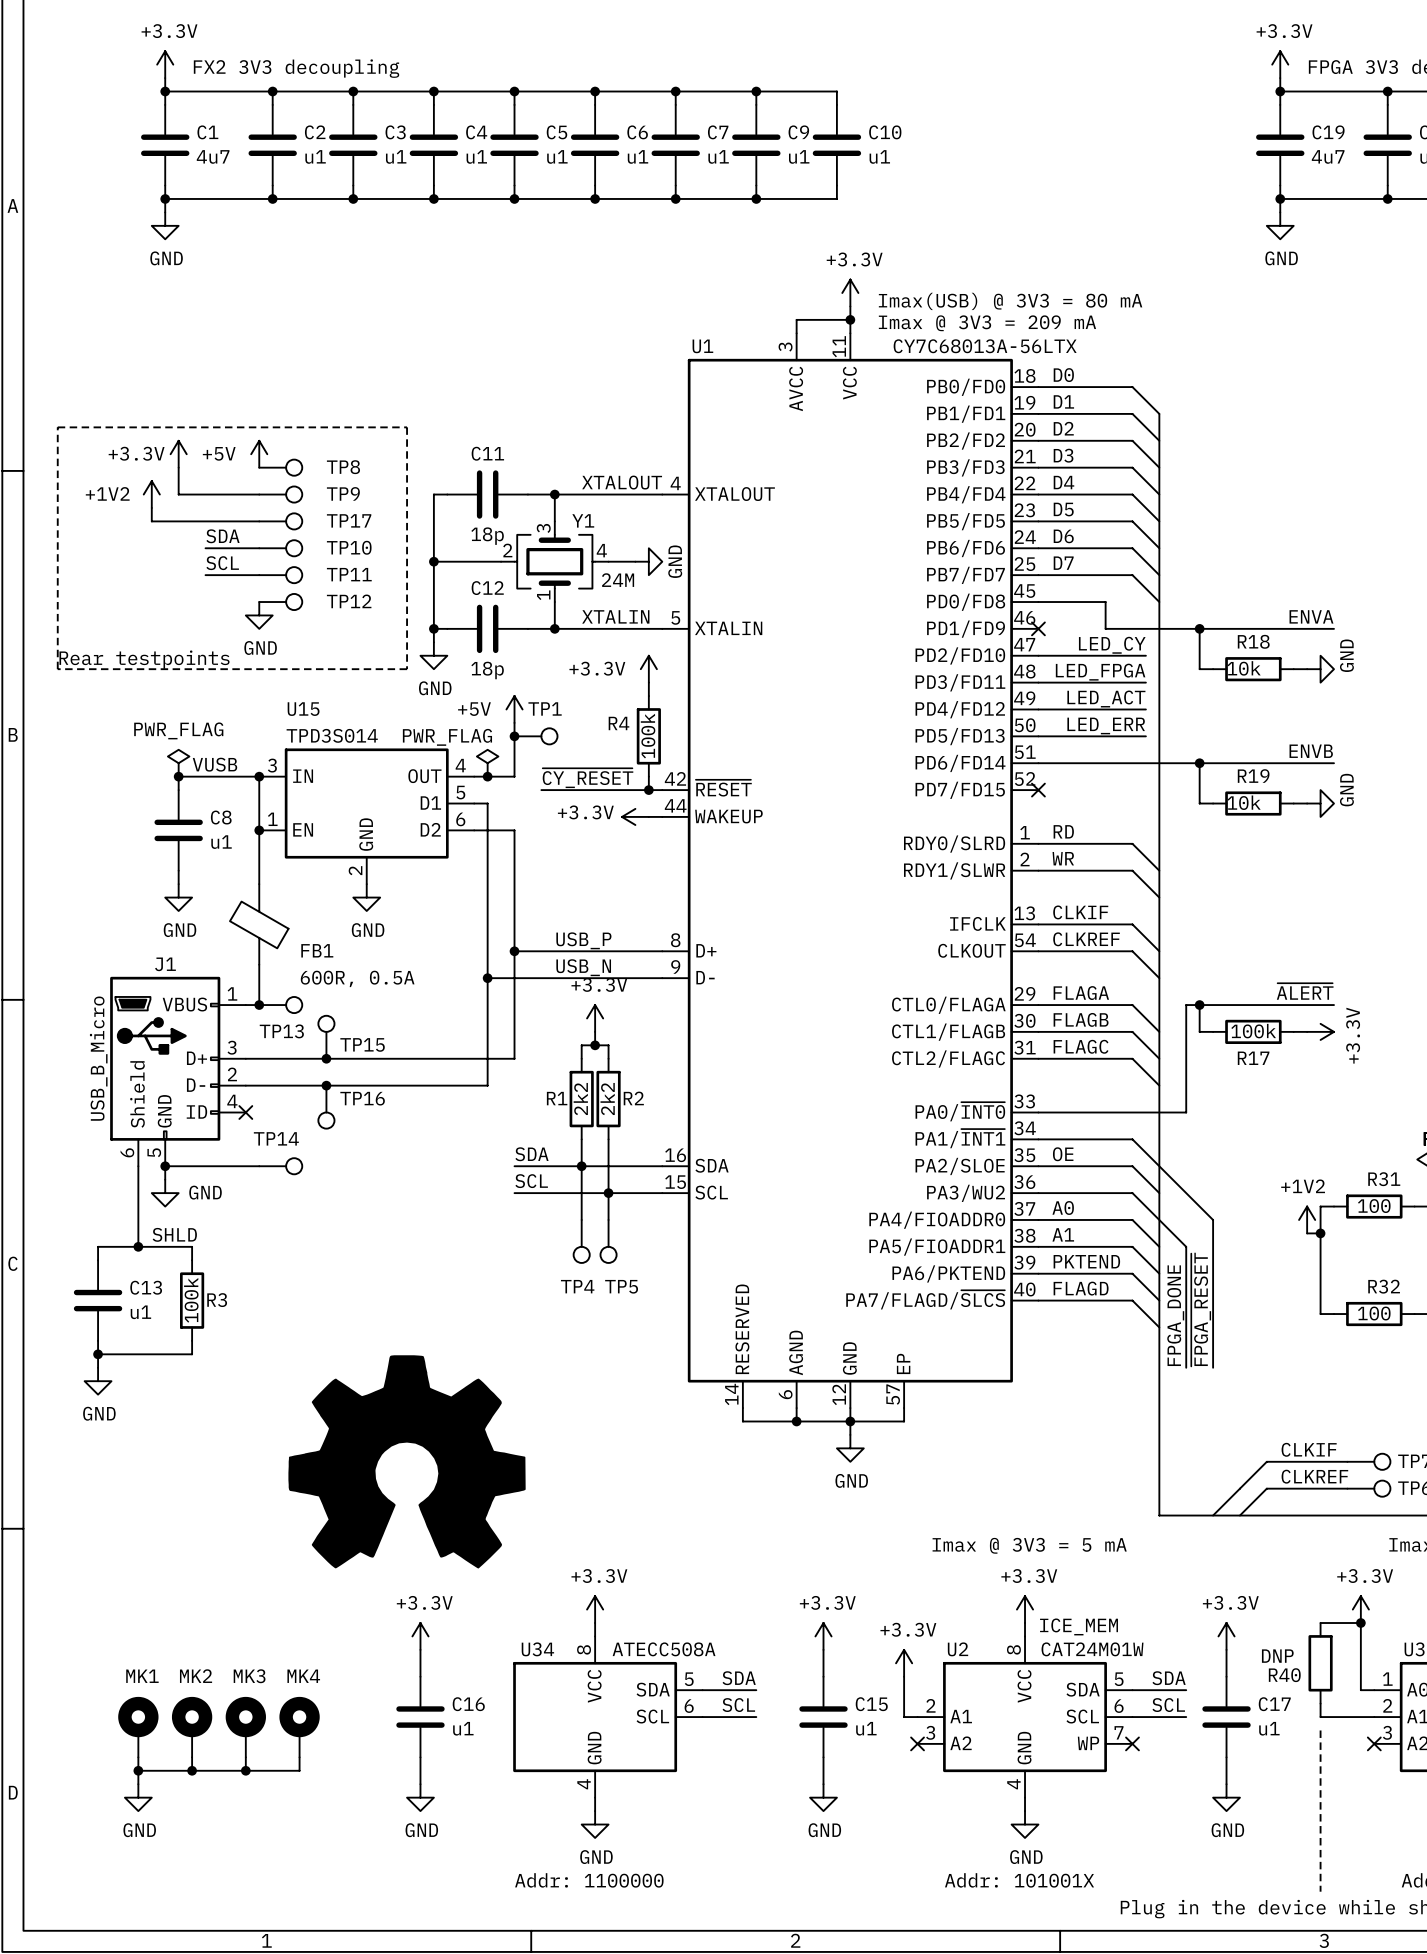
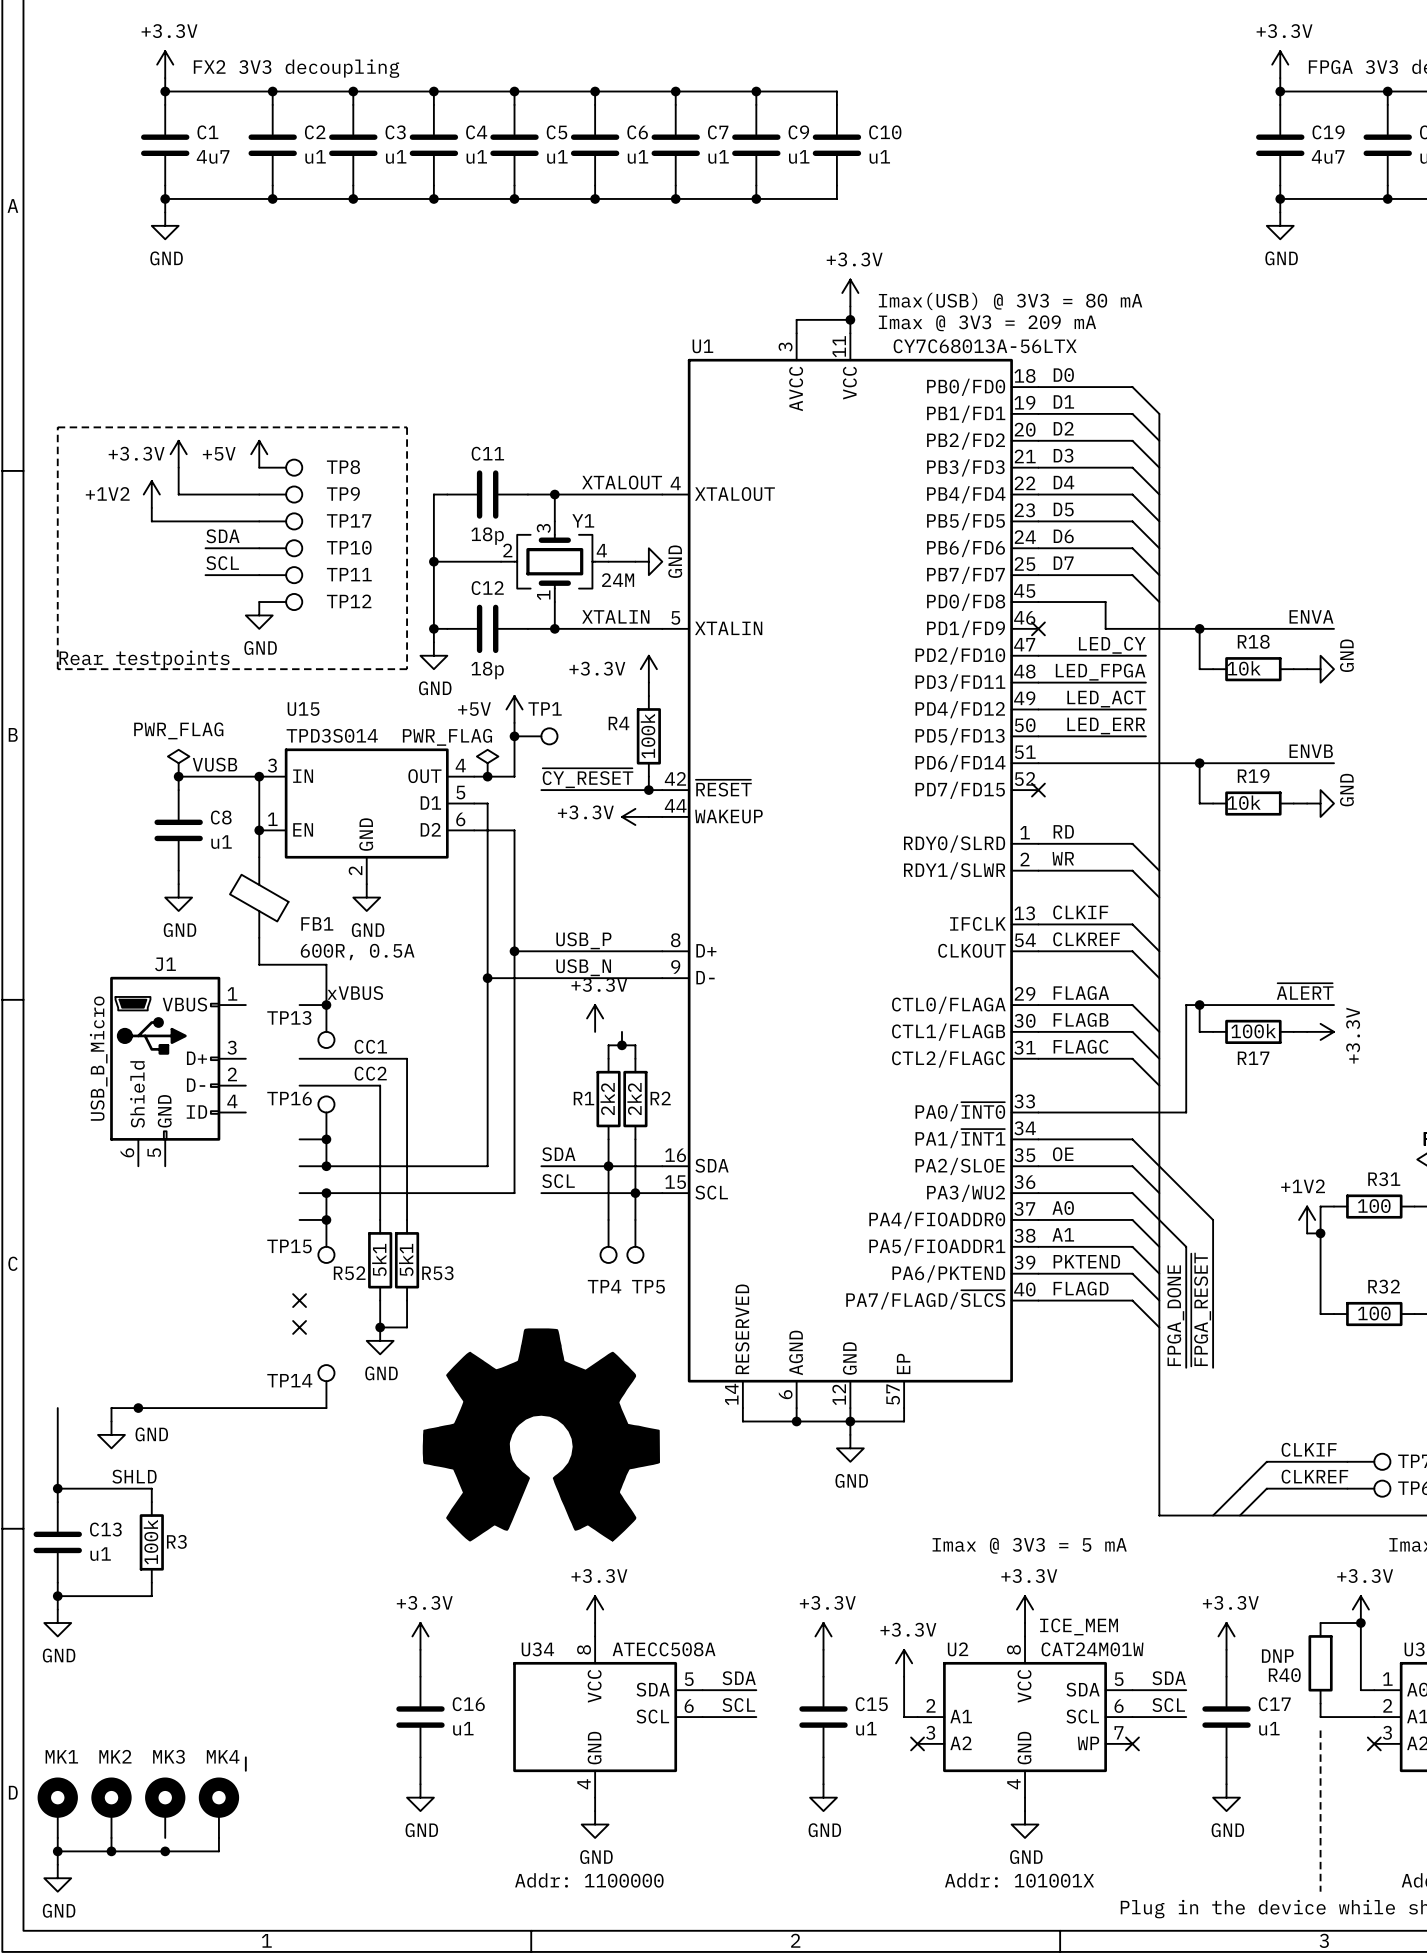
FB1 position: (259, 924) -> (259, 897)
wire: none -> (259, 937) (259, 964) (326, 964) (326, 1005) (299, 1005)
wire: (259, 964) (259, 1005) (245, 1005) -> none
label: none -> xVBUS (355, 993)
junction: (259, 1005) -> none
TP13 position: (280, 1005) -> (326, 1026)
TP13 rotation: 0° (294, 1005) -> 90° clockwise (326, 1039)
junction: none -> (326, 1005)
TP15 rotation: 0° (326, 1023) -> 180° (326, 1254)
TP13 name position: TP13 (281, 1031) -> TP13 (289, 1017)
wire: (595, 1031) (595, 1045) -> (621, 1031) (621, 1045)
TP15 position: (326, 1037) -> (326, 1241)
junction position: (595, 1045) -> (621, 1045)
wire: (608, 1045) (581, 1045) (581, 1058) -> (608, 1045) (635, 1045) (635, 1058)
label: none -> CC1 (370, 1046)
wire: (245, 1058) (299, 1058) -> none
junction: (326, 1058) -> none
wire: (407, 1058) (514, 1058) -> (299, 1193) (514, 1193) (514, 1058)
wire: none -> (407, 1058) (407, 1219)
label: none -> CC2 (370, 1073)
wire: (245, 1085) (299, 1085) -> none
junction: (326, 1085) -> none
wire: (380, 1085) (487, 1085) -> (299, 1166) (487, 1166) (487, 1085)
wire: none -> (380, 1085) (380, 1219)
TP16 name position: TP16 (362, 1098) -> TP16 (289, 1098)
R2 name: R2 (633, 1098) -> R1 (583, 1098)
R1: 2k2 (581, 1099) -> none
R2: none -> 2k2 (635, 1099)
no-connect mark: (245, 1112) -> none
TP16 rotation: 0° (326, 1120) -> 180° (326, 1104)
TP14 name position: TP14 (276, 1138) -> TP14 (289, 1380)
wire: none -> (299, 1139) (326, 1139) (326, 1166)
junction: none -> (326, 1139)
wire: (581, 1139) (581, 1219) -> (635, 1139) (635, 1219)
label position: SDA (531, 1154) -> SDA (558, 1154)
wire: (138, 1166) (138, 1246) -> none
junction: (165, 1166) -> none
wire: (259, 1166) (165, 1166) (165, 1179) -> none
TP14 position: (280, 1166) -> (326, 1386)
TP14 rotation: 0° (294, 1166) -> 90° counterclockwise (326, 1373)
junction: none -> (326, 1166)
wire: (514, 1166) (541, 1166) -> none
junction: (581, 1166) -> none
junction: none -> (608, 1166)
label position: SCL (531, 1181) -> SCL (558, 1181)
power symbol: GND (165, 1193) -> none
wire: none -> (326, 1193) (326, 1219) (299, 1219)
junction: none -> (326, 1193)
wire: (514, 1193) (541, 1193) -> none
junction: (608, 1193) -> none
junction: none -> (635, 1193)
junction: none -> (326, 1219)
label position: SHLD (174, 1234) -> SHLD (134, 1476)
TP4: (581, 1241) -> none
TP5: none -> (635, 1241)
junction: (138, 1246) -> none
wire: (98, 1260) (98, 1246) (192, 1246) (192, 1260) -> none
R52: none -> 5k1 (380, 1260)
R53: none -> 5k1 (407, 1260)
TP5 name: TP5 (621, 1286) -> TP4 (604, 1286)
C13 position: (98, 1300) -> (57, 1542)
R3 position: (192, 1300) -> (151, 1542)
no-connect mark: none -> (299, 1300)
wire: none -> (380, 1300) (380, 1327) (407, 1327) (407, 1300)
no-connect mark: none -> (299, 1327)
junction: none -> (380, 1327)
wire: (98, 1340) (98, 1367) -> (57, 1582) (57, 1609)
wire: (192, 1340) (192, 1354) (98, 1354) -> (151, 1582) (151, 1596) (57, 1596)
power symbol: none -> GND (380, 1340)
junction: (98, 1354) -> none
power symbol position: GND (98, 1381) -> GND (111, 1434)
wire: none -> (57, 1408) (57, 1502)
junction: none -> (138, 1408)
wire: none -> (326, 1408) (111, 1408) (111, 1421)
power symbol text position: GND (99, 1413) -> GND (151, 1434)
power symbol position: (407, 1461) -> (541, 1434)
wire: none -> (57, 1488) (151, 1488) (151, 1502)
junction: none -> (57, 1488)
junction: none -> (57, 1596)
power symbol: none -> GND (57, 1623)
MK1 position: (138, 1727) -> (57, 1807)
MK2 position: (192, 1727) -> (111, 1807)
MK3 position: (245, 1727) -> (165, 1807)
MK4 position: (299, 1727) -> (218, 1807)
wire: (138, 1757) (138, 1784) -> (57, 1837) (57, 1864)
wire: (192, 1757) (192, 1770) -> (111, 1837) (111, 1851)
wire: (299, 1757) (299, 1770) (138, 1770) -> (218, 1837) (218, 1851) (57, 1851)
junction: (138, 1770) -> none
junction: (192, 1770) -> none
junction: (245, 1770) -> none
power symbol: GND (138, 1797) -> none
junction: none -> (57, 1851)
junction: none -> (111, 1851)
junction: none -> (165, 1851)
power symbol: none -> GND (57, 1878)

